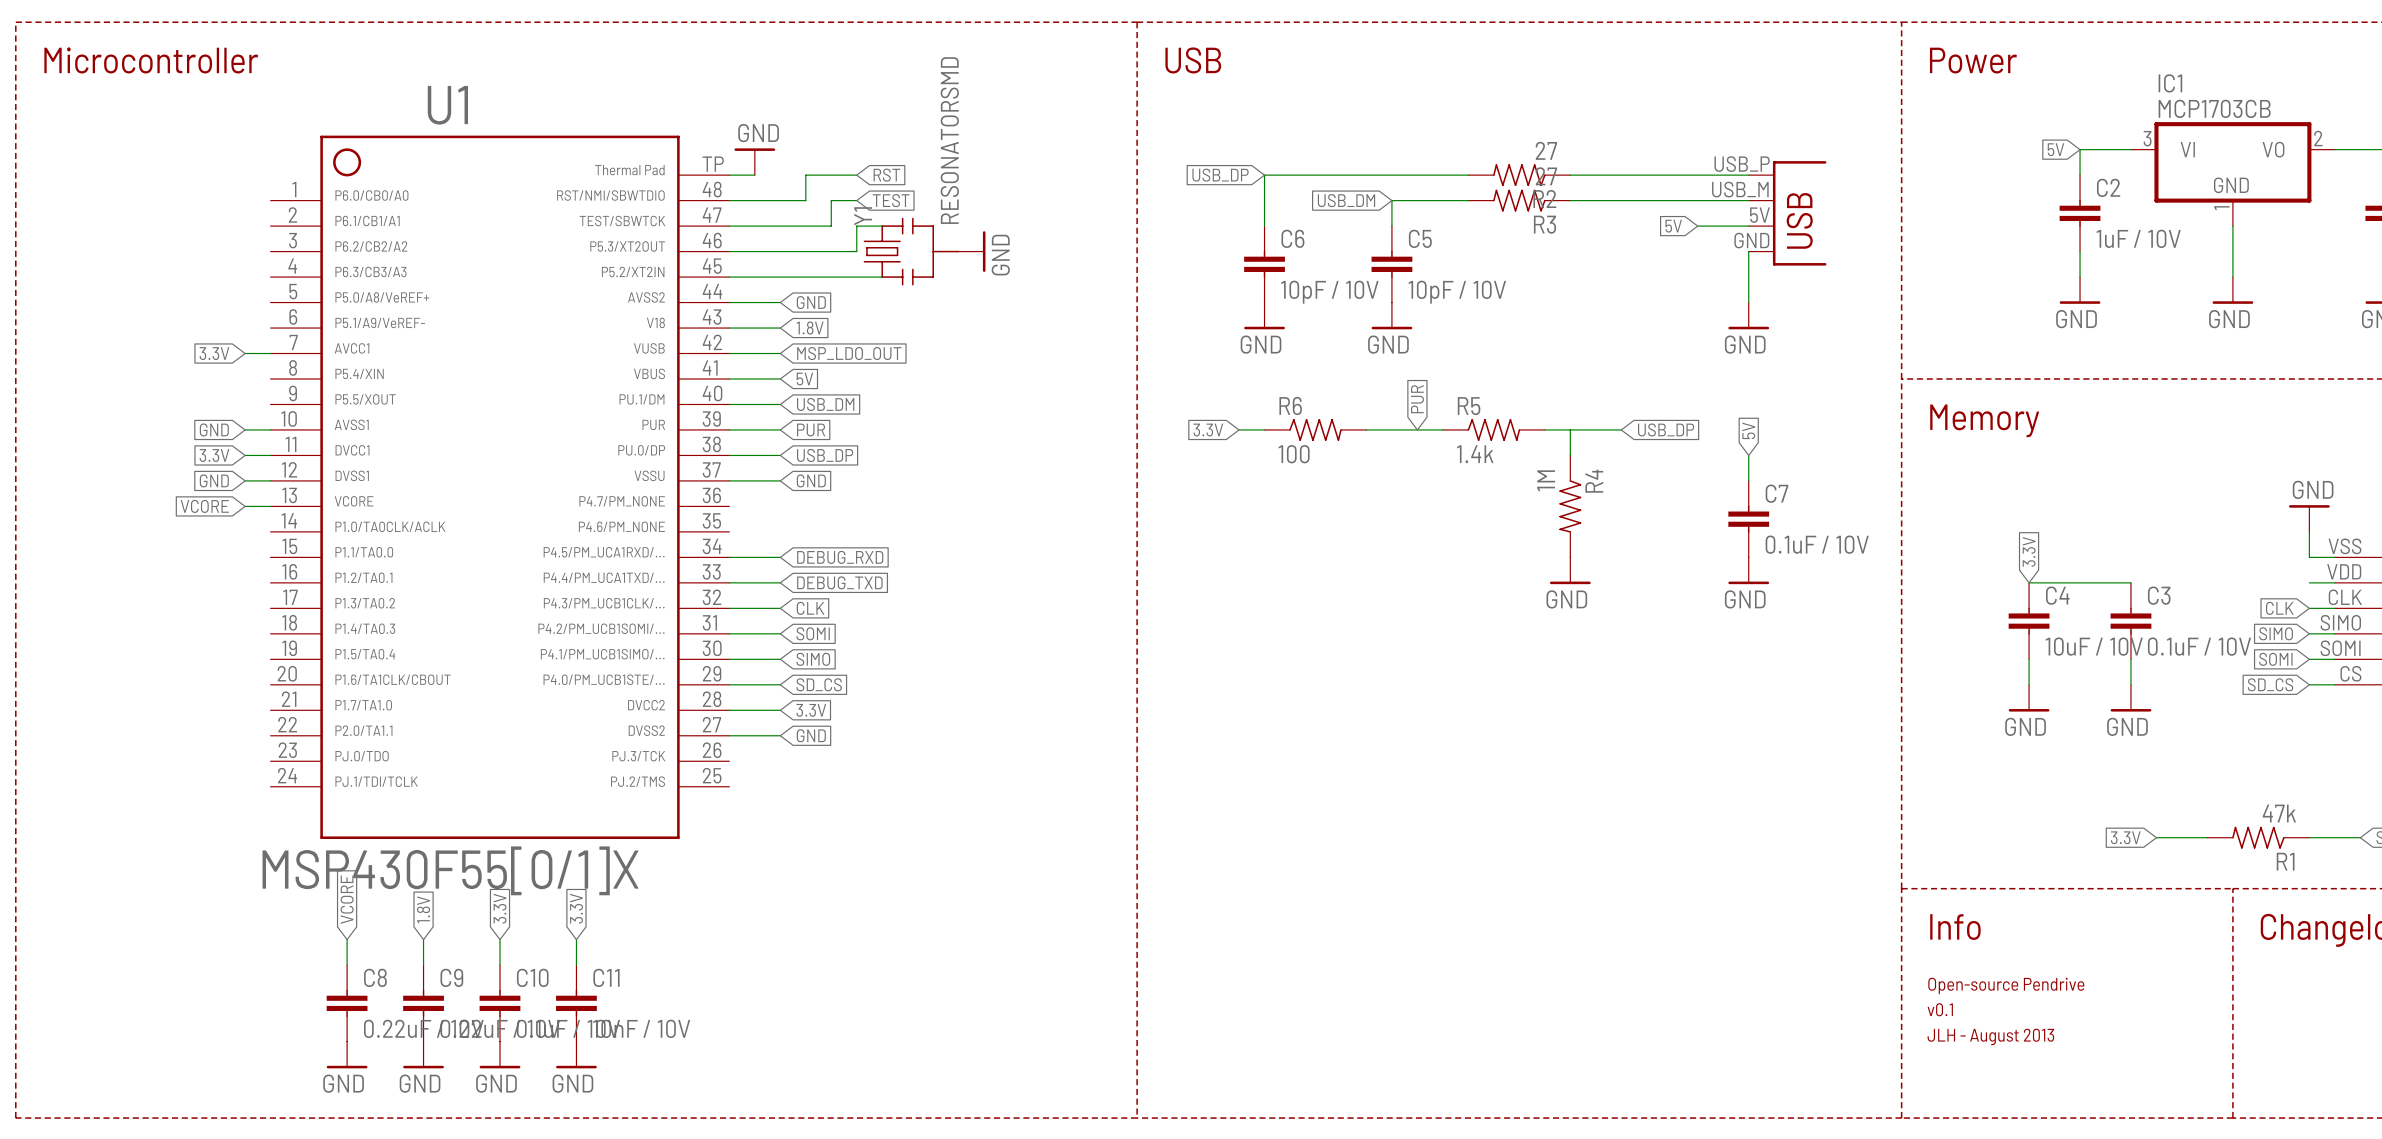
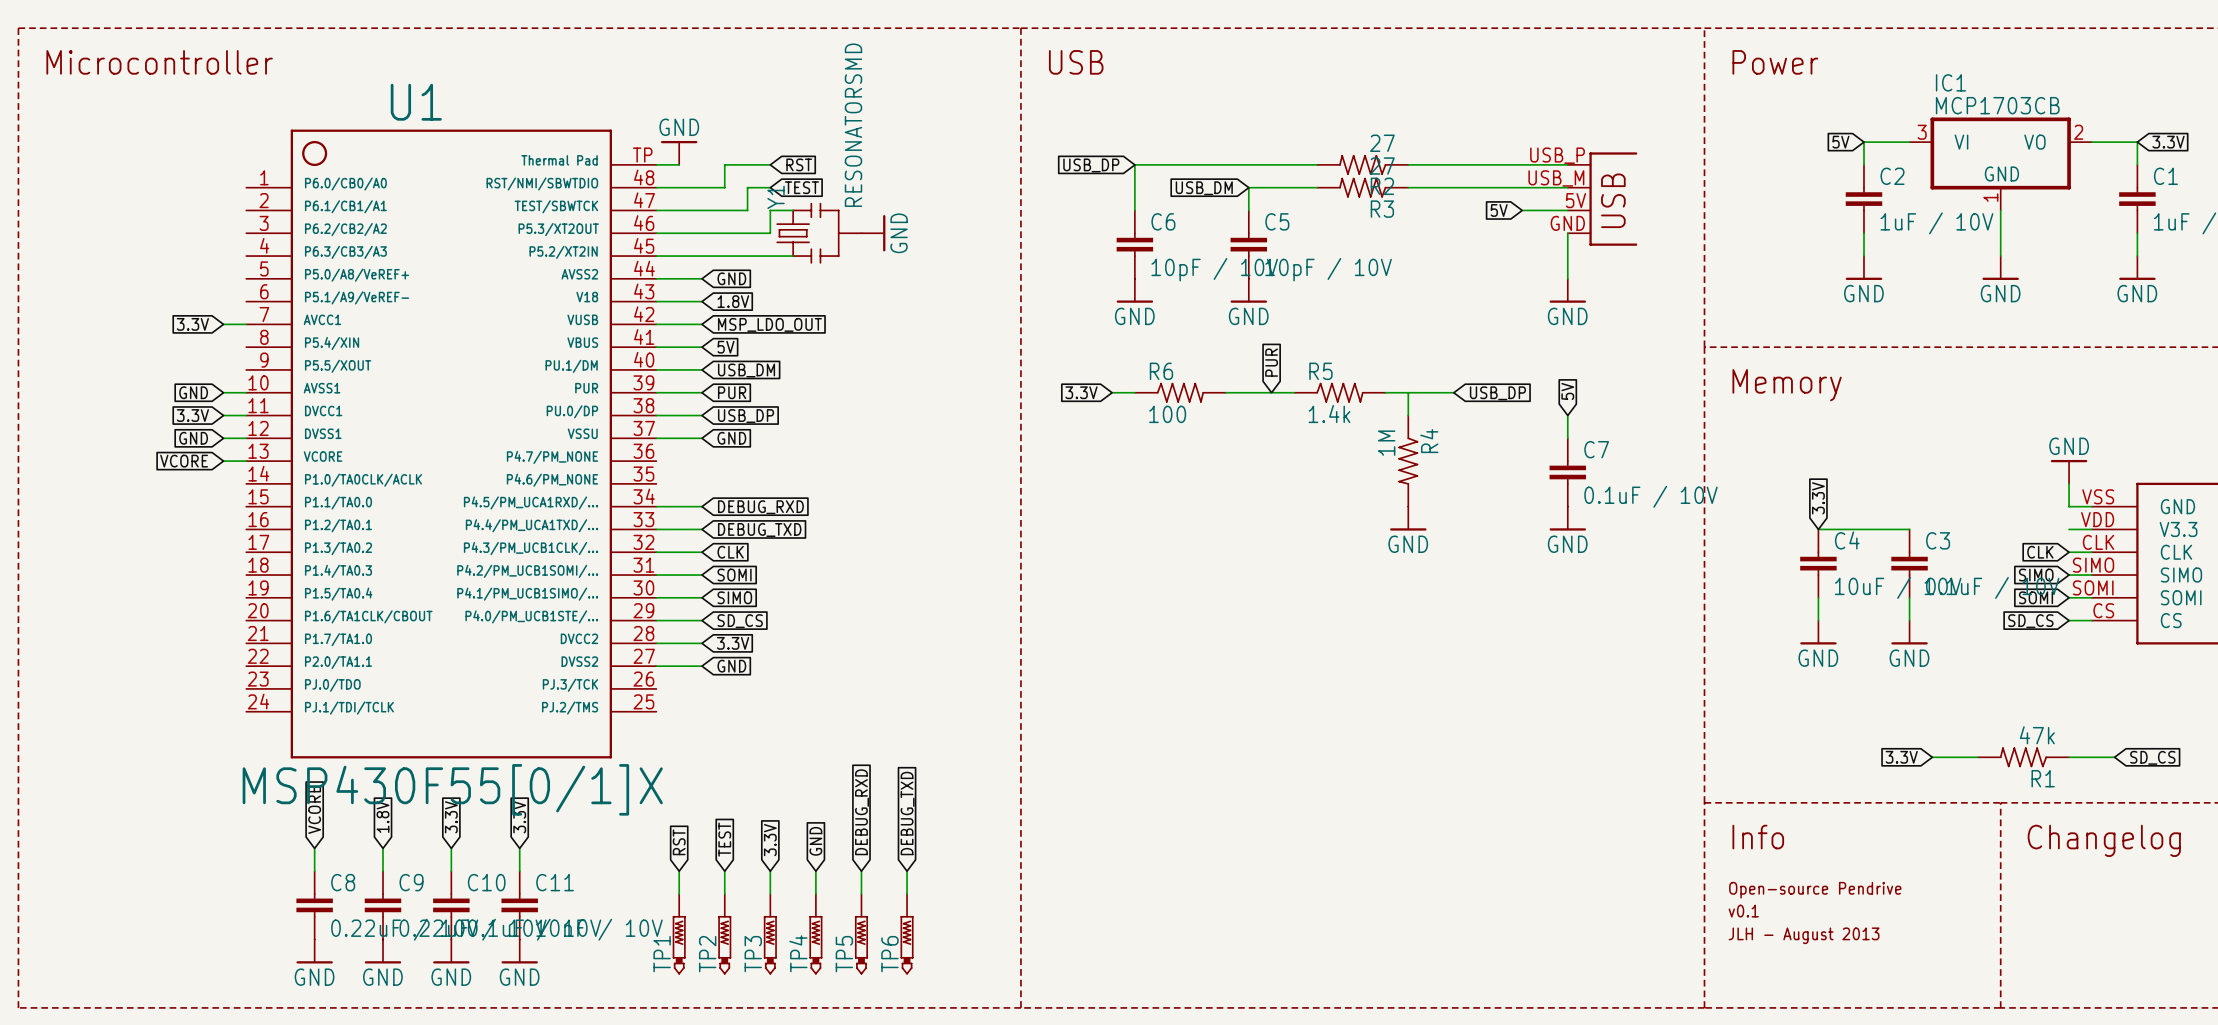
global label: none -> DEBUG_RXD (862, 812)
global label: none -> DEBUG_TXD (907, 813)
global label: none -> TEST (724, 839)
global label: none -> RST (679, 842)
global label: none -> 3.3V (770, 840)
global label: none -> GND (815, 841)
wire: none -> (679, 871) (679, 894)
wire: none -> (724, 871) (724, 894)
wire: none -> (770, 871) (770, 894)
wire: none -> (815, 871) (815, 894)
wire: none -> (861, 871) (861, 894)
wire: none -> (907, 871) (907, 894)
TP1: none -> (679, 934)
TP2: none -> (724, 934)
TP3: none -> (770, 934)
TP4: none -> (815, 934)
TP5: none -> (861, 934)
TP6: none -> (907, 934)

